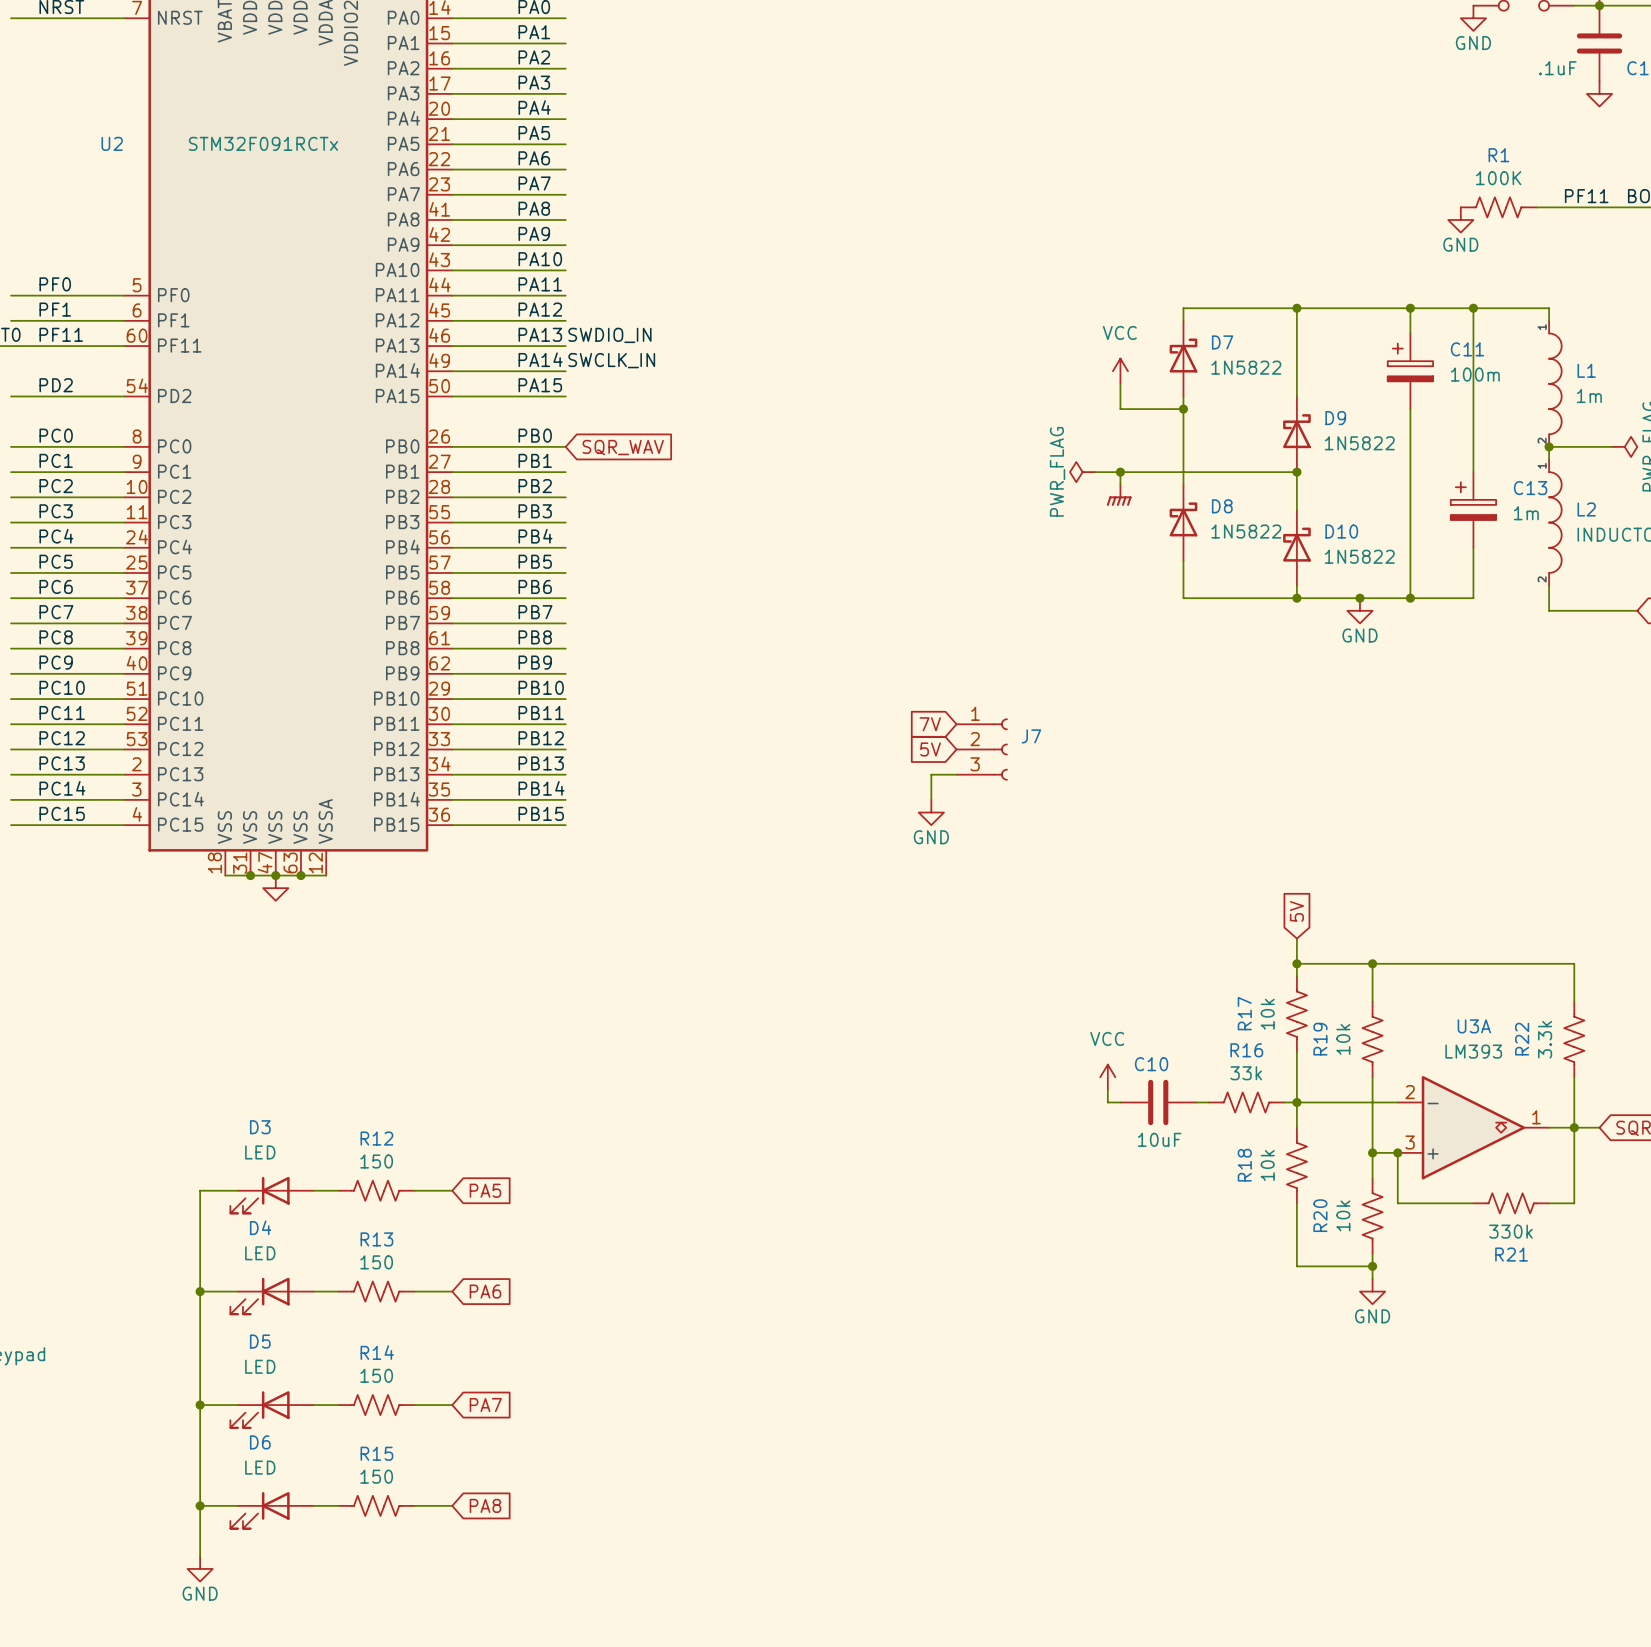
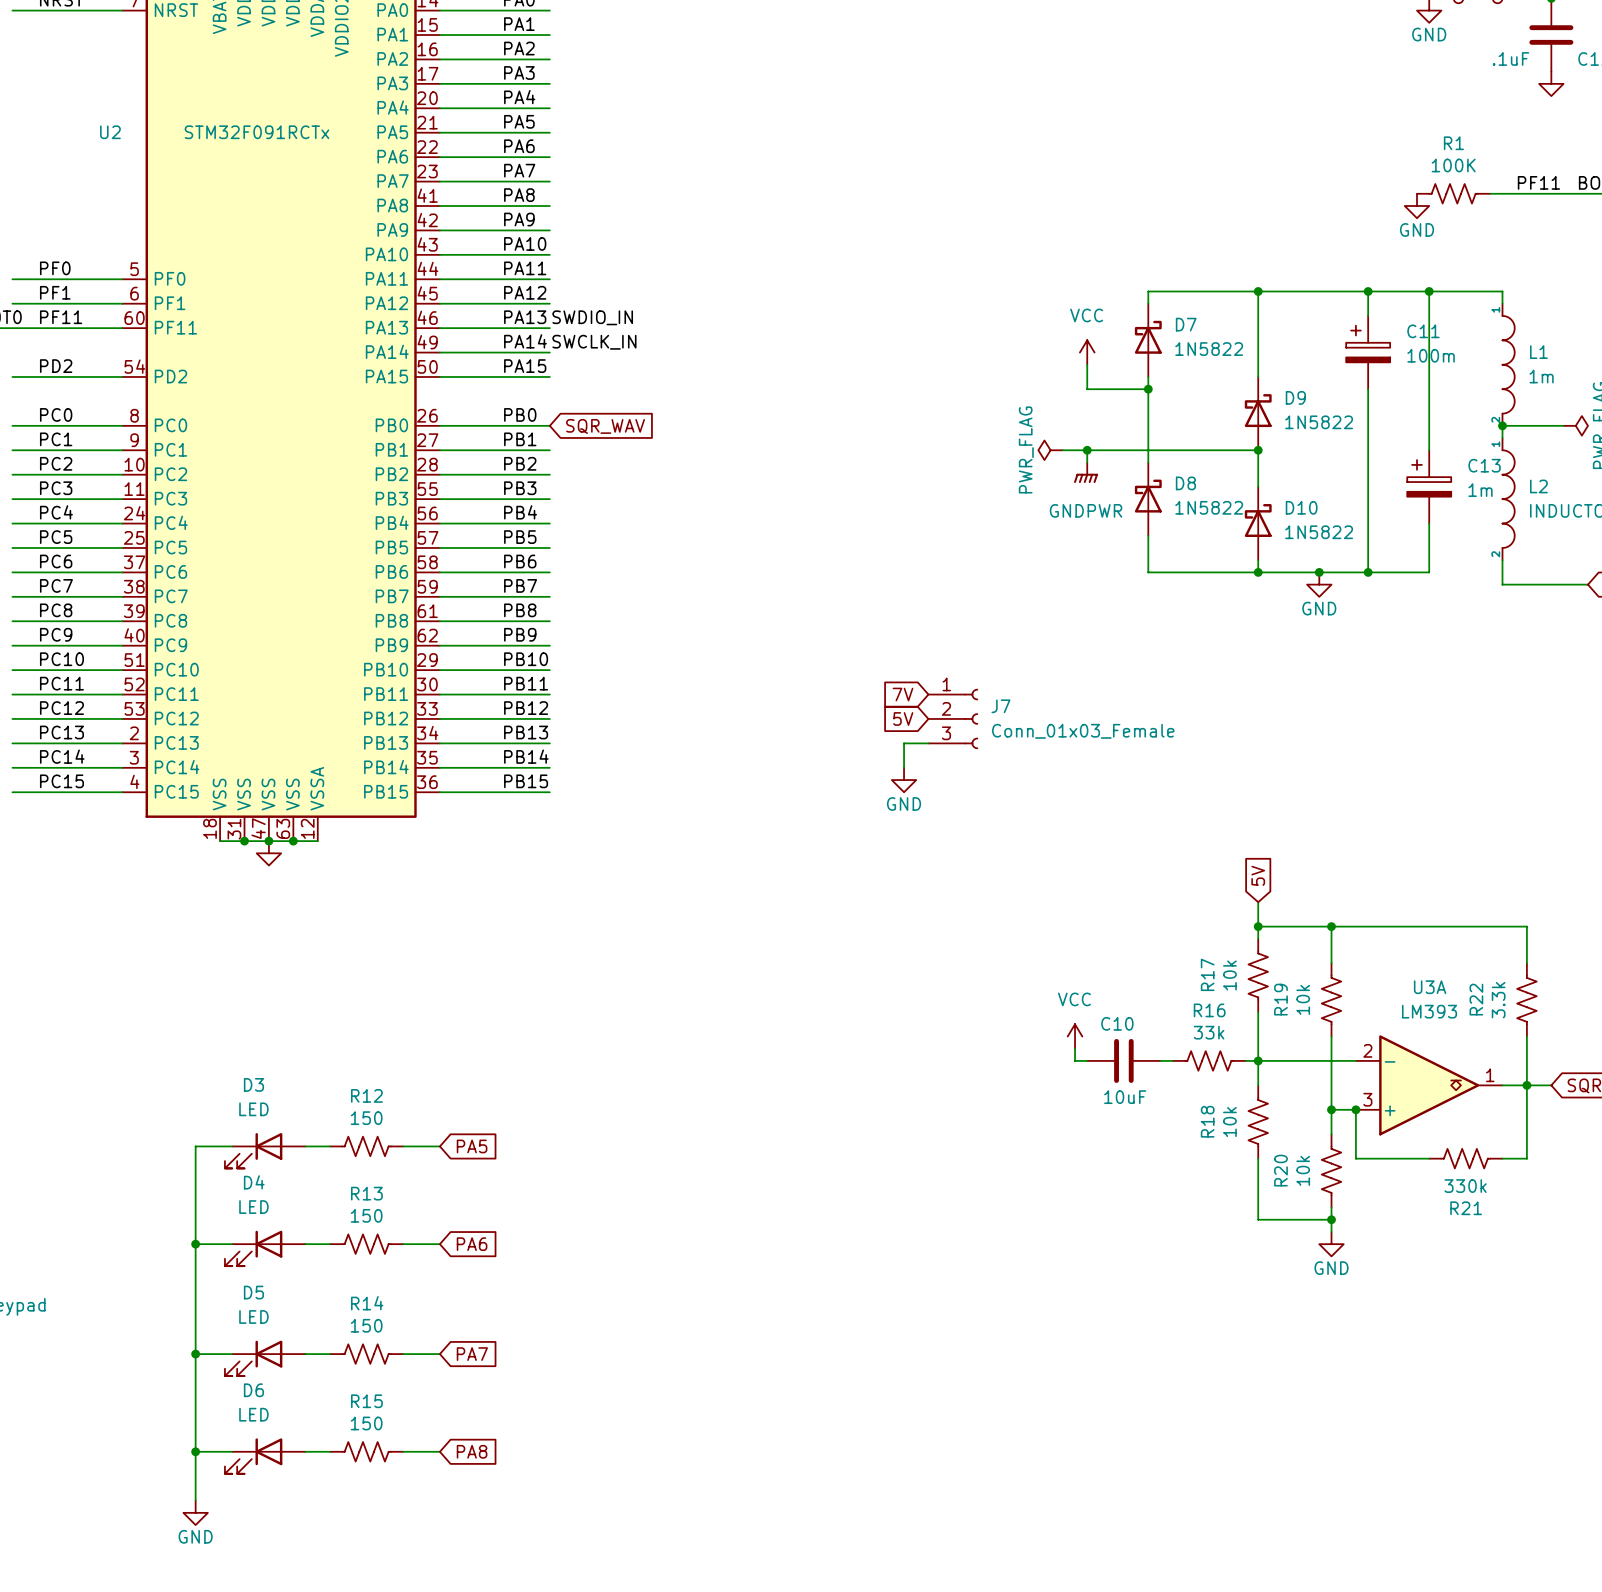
power symbol text: none -> GNDPWR (1086, 510)
J7 value: none -> Conn_01x03_Female (1083, 731)

